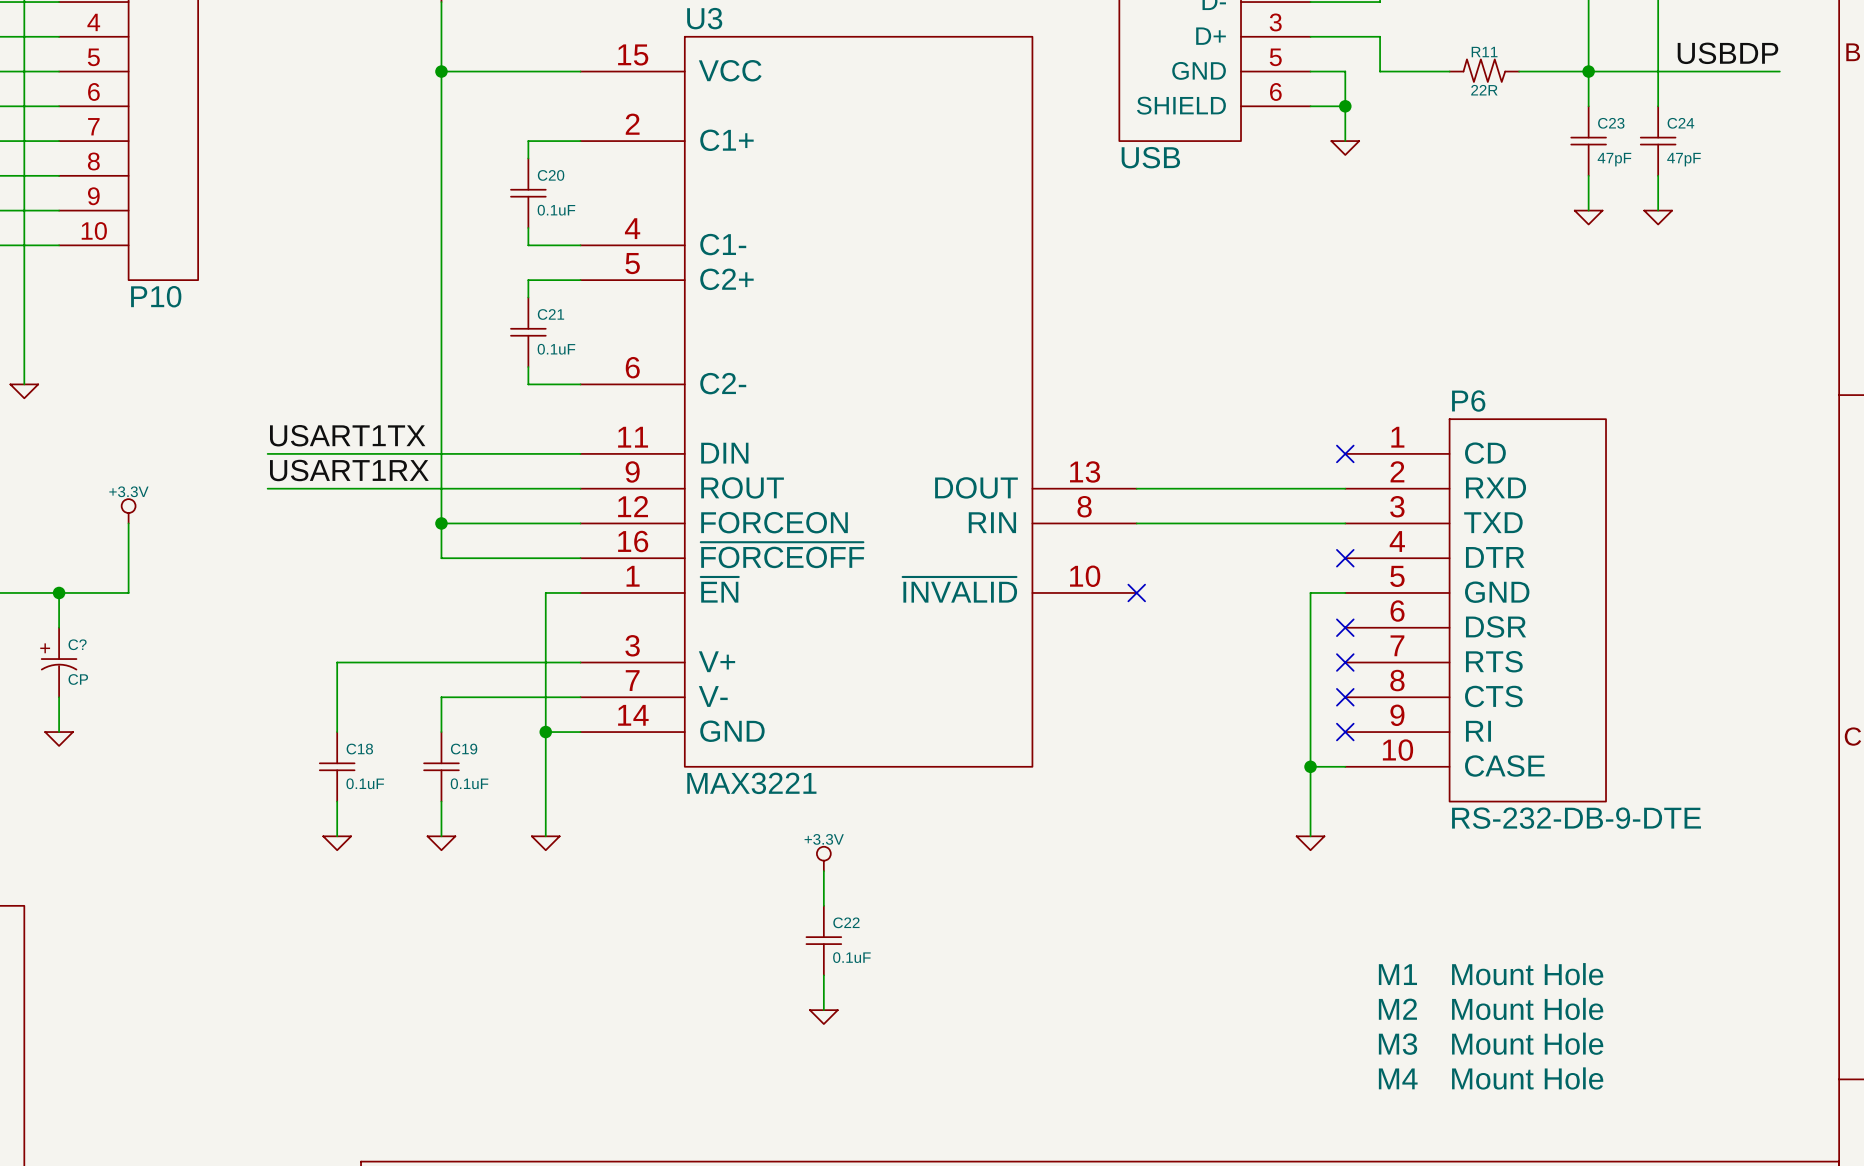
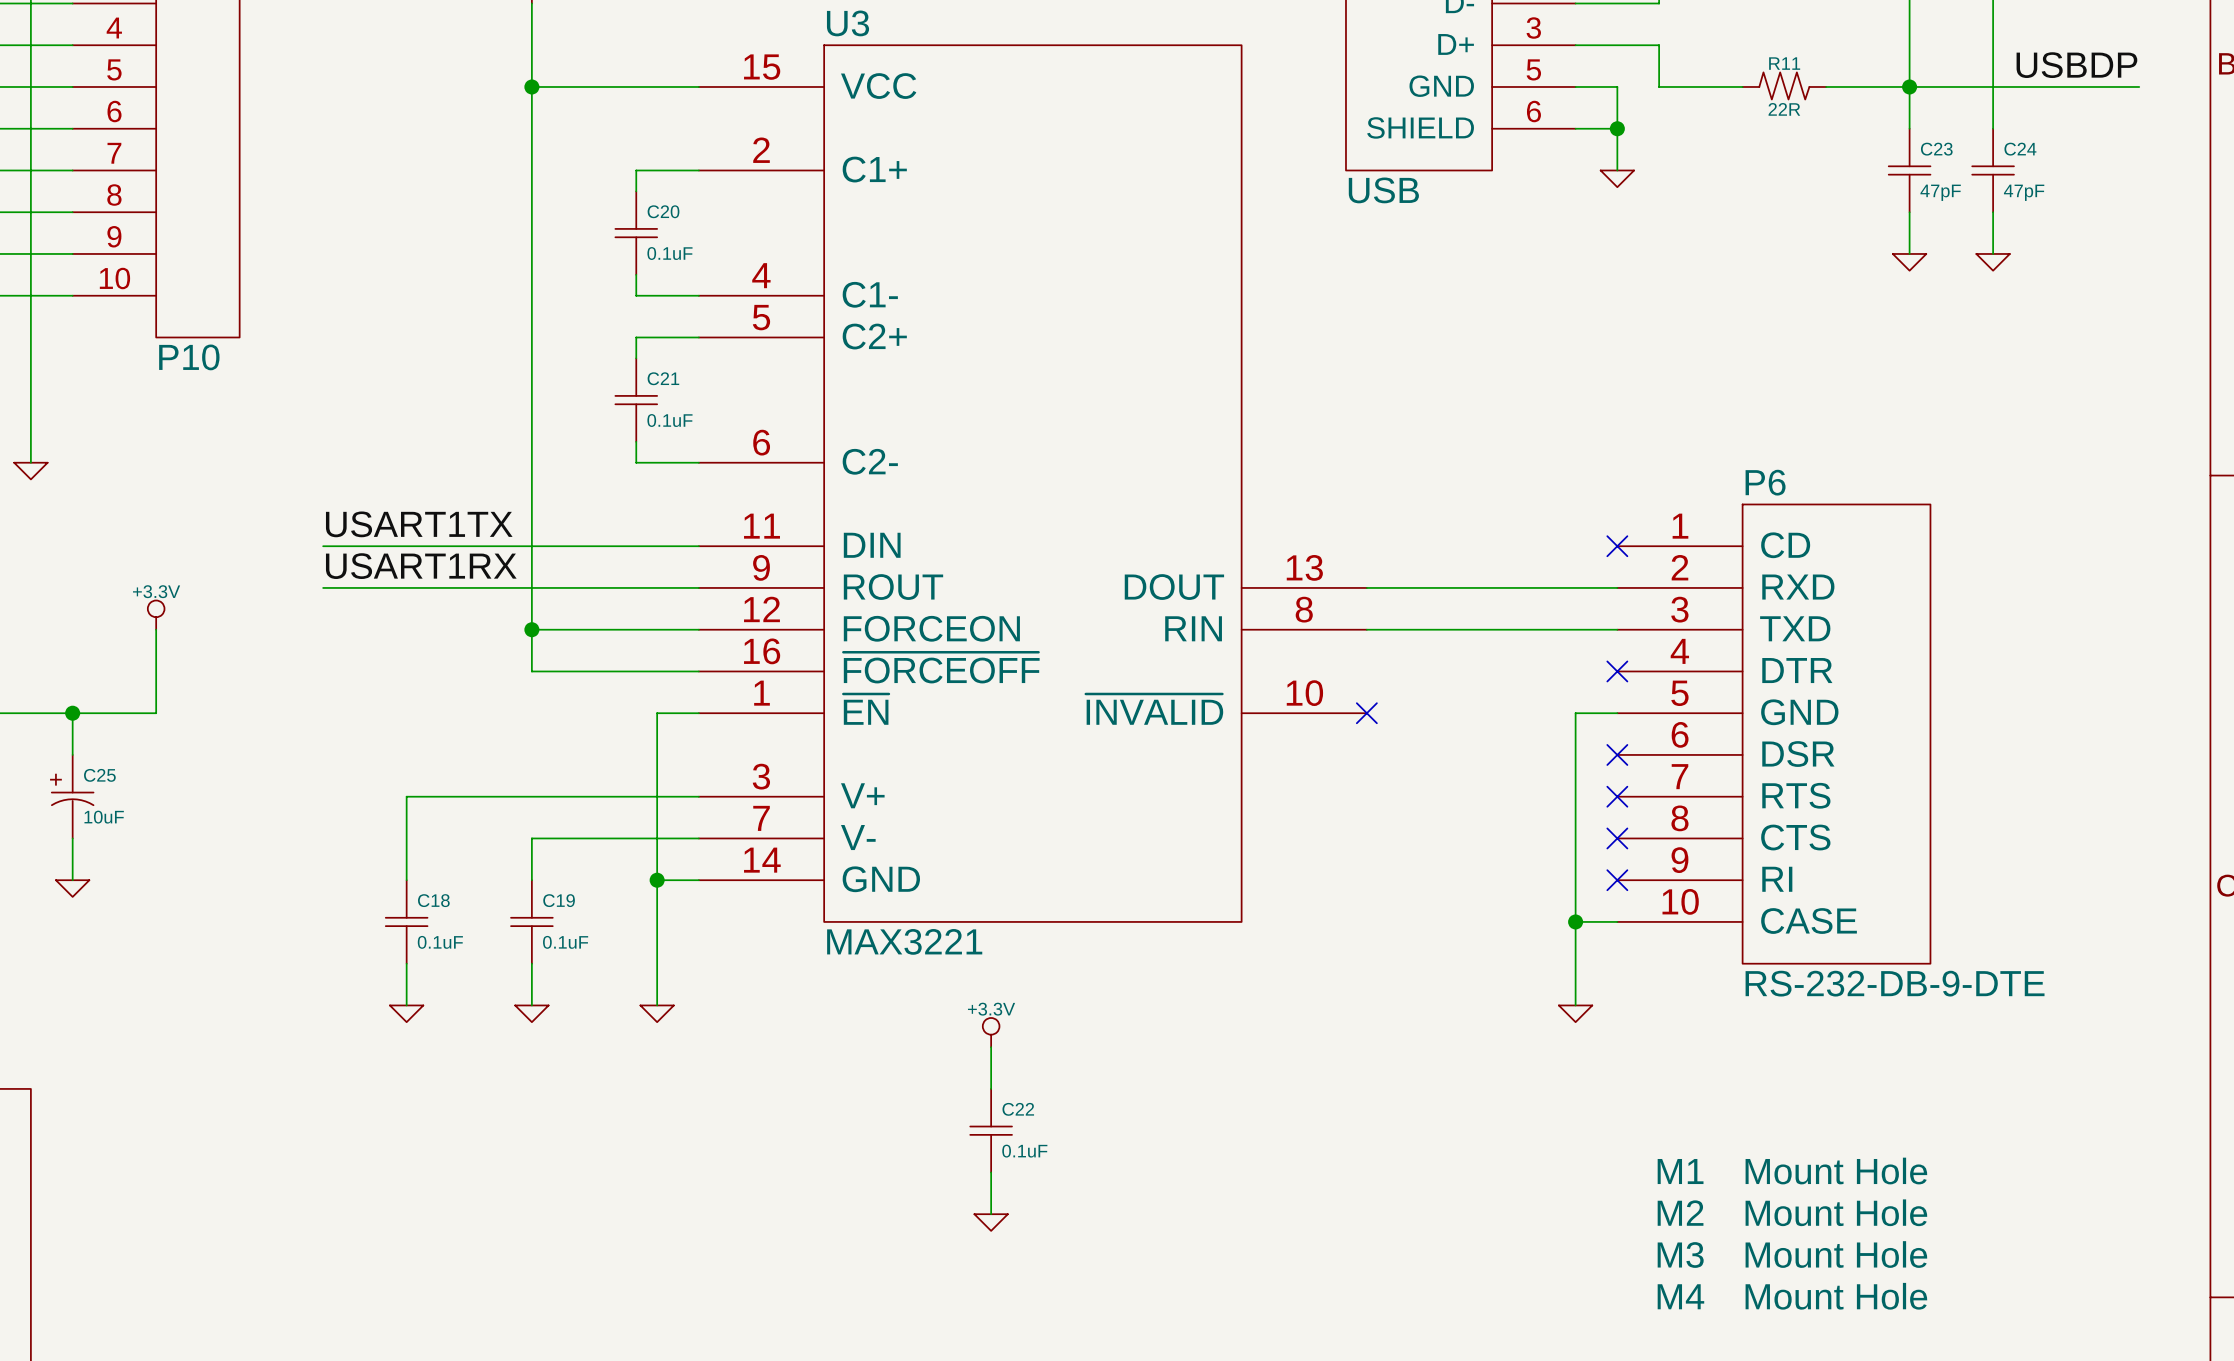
C? name: C? (77, 644) -> C25 (99, 775)
C? value: CP (78, 679) -> 10uF (104, 817)

